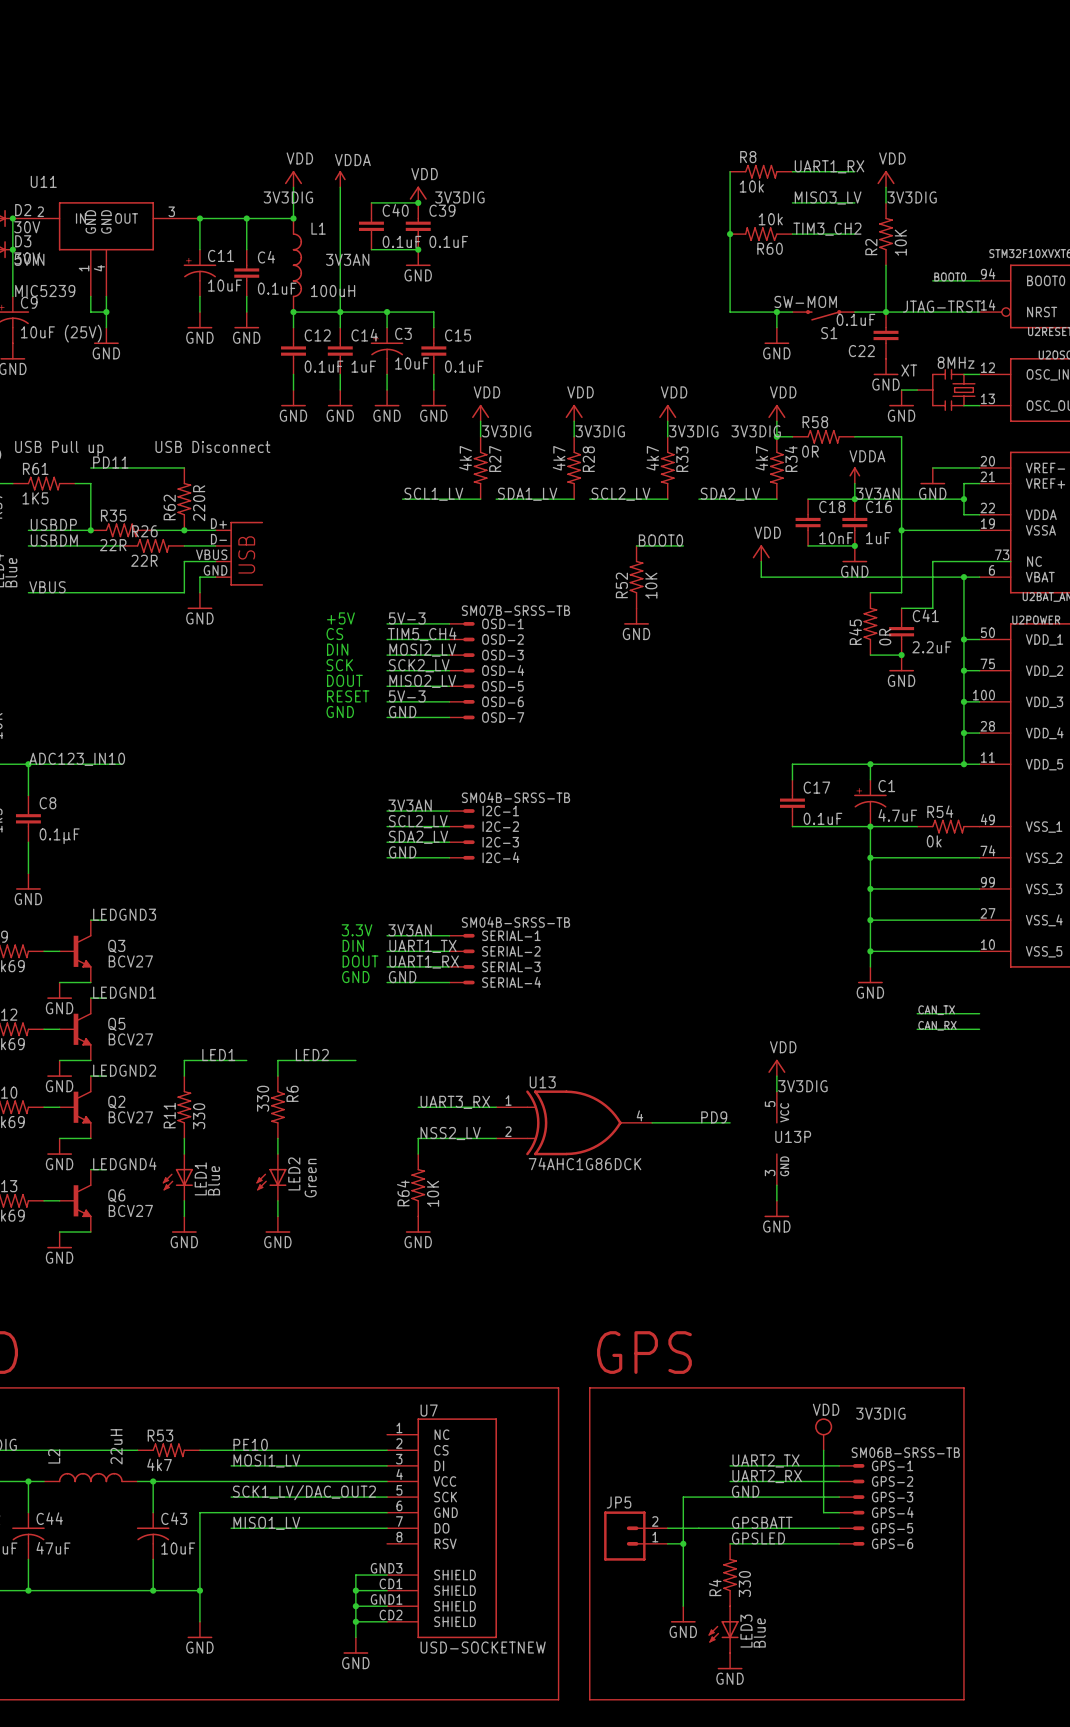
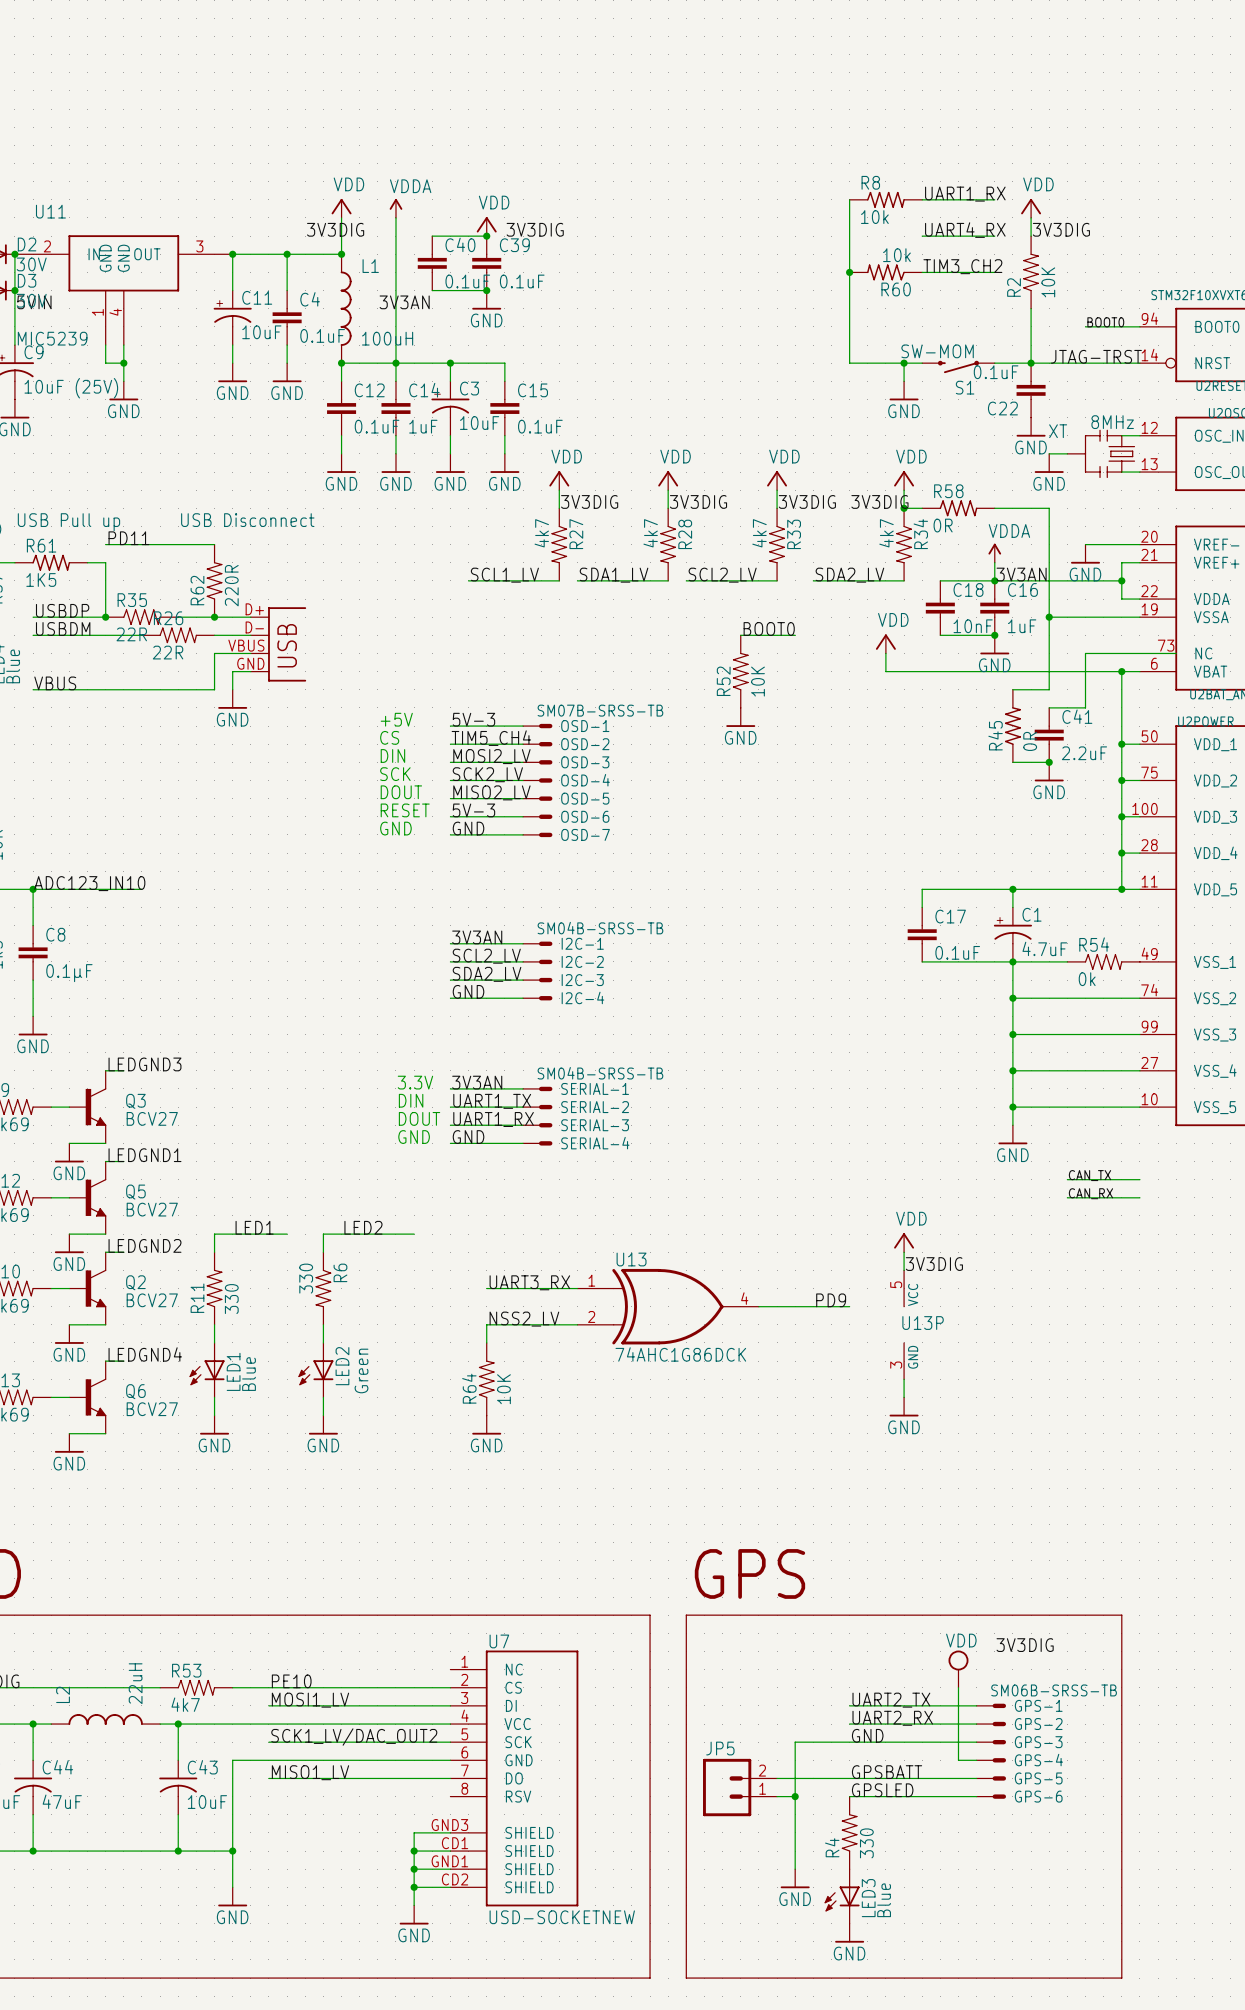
label: MISO3_LV (828, 197) -> UART4_RX (965, 230)

